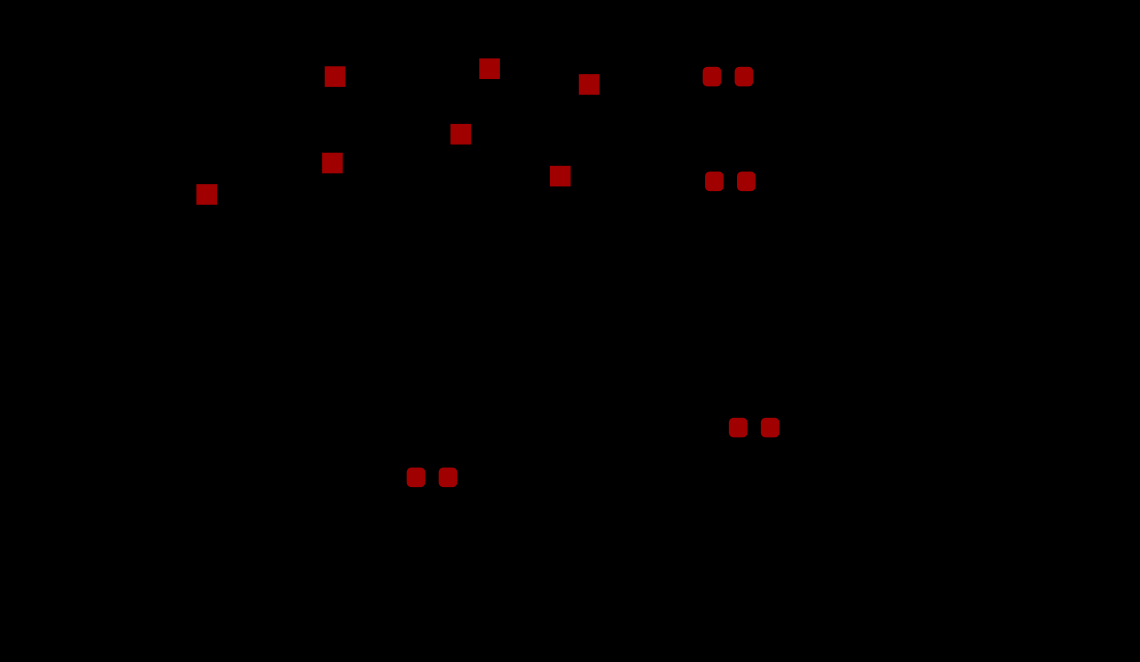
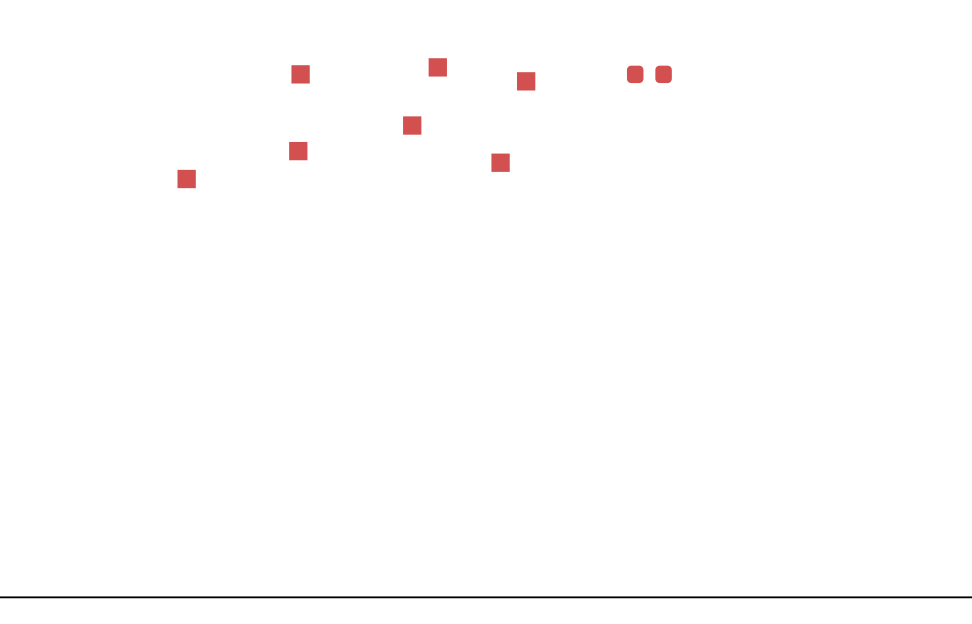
part: (730, 181) -> none
part: (754, 427) -> none
part: (431, 477) -> none

